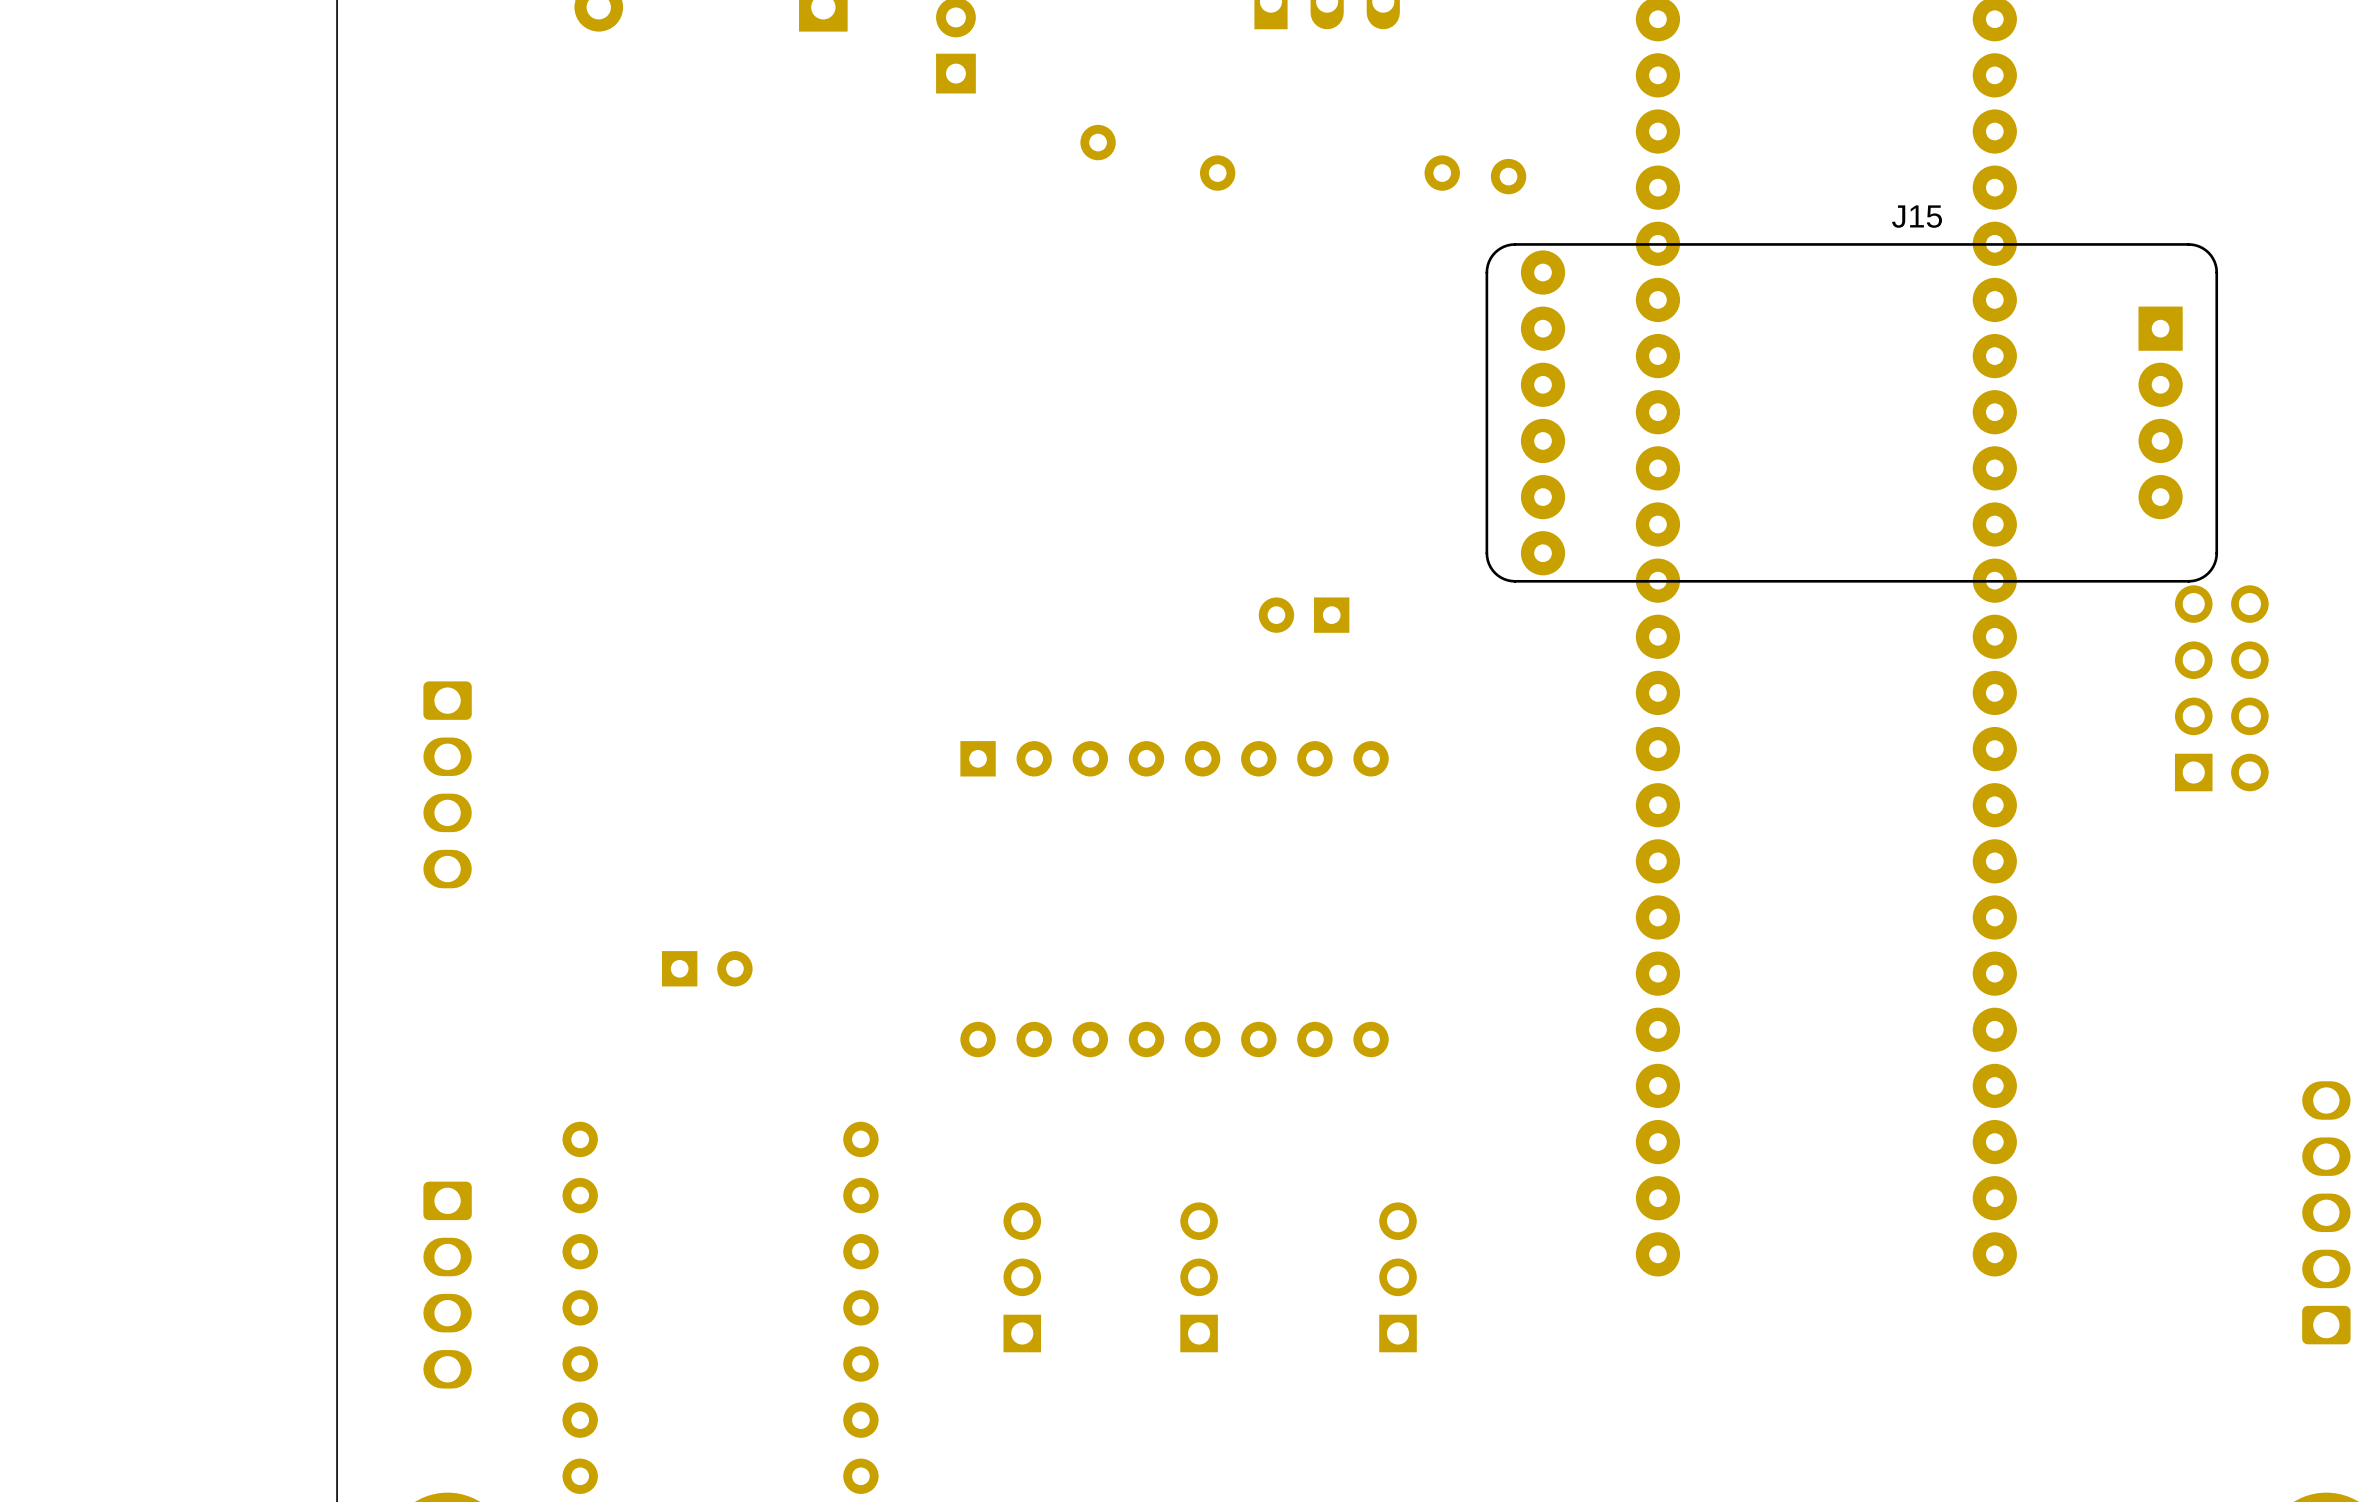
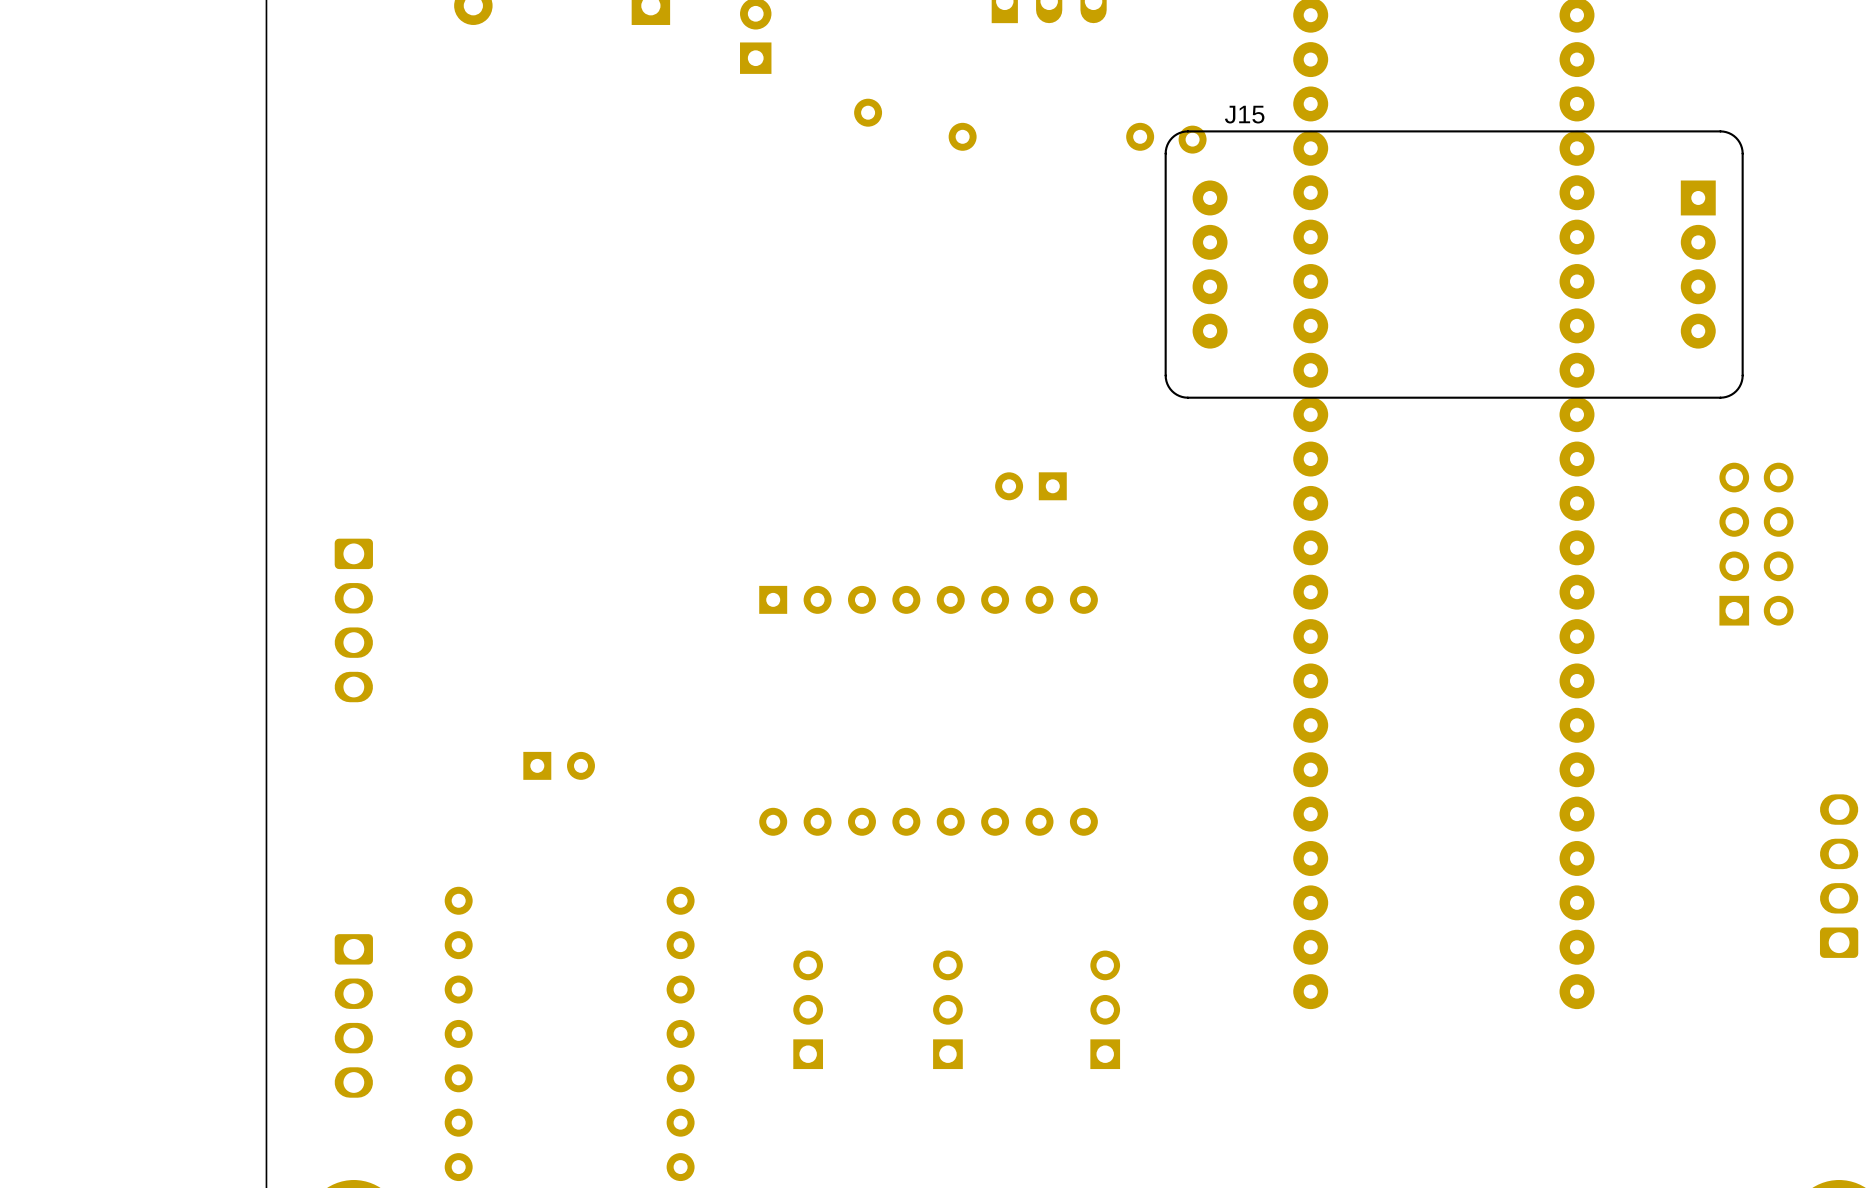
J15 name position: J15 (1917, 216) -> J15 (1244, 114)
J15 footprint: [1485, 243, 2219, 583] -> [1164, 130, 1744, 399]
part: none -> (1839, 876)
part: (2326, 1212) -> none

